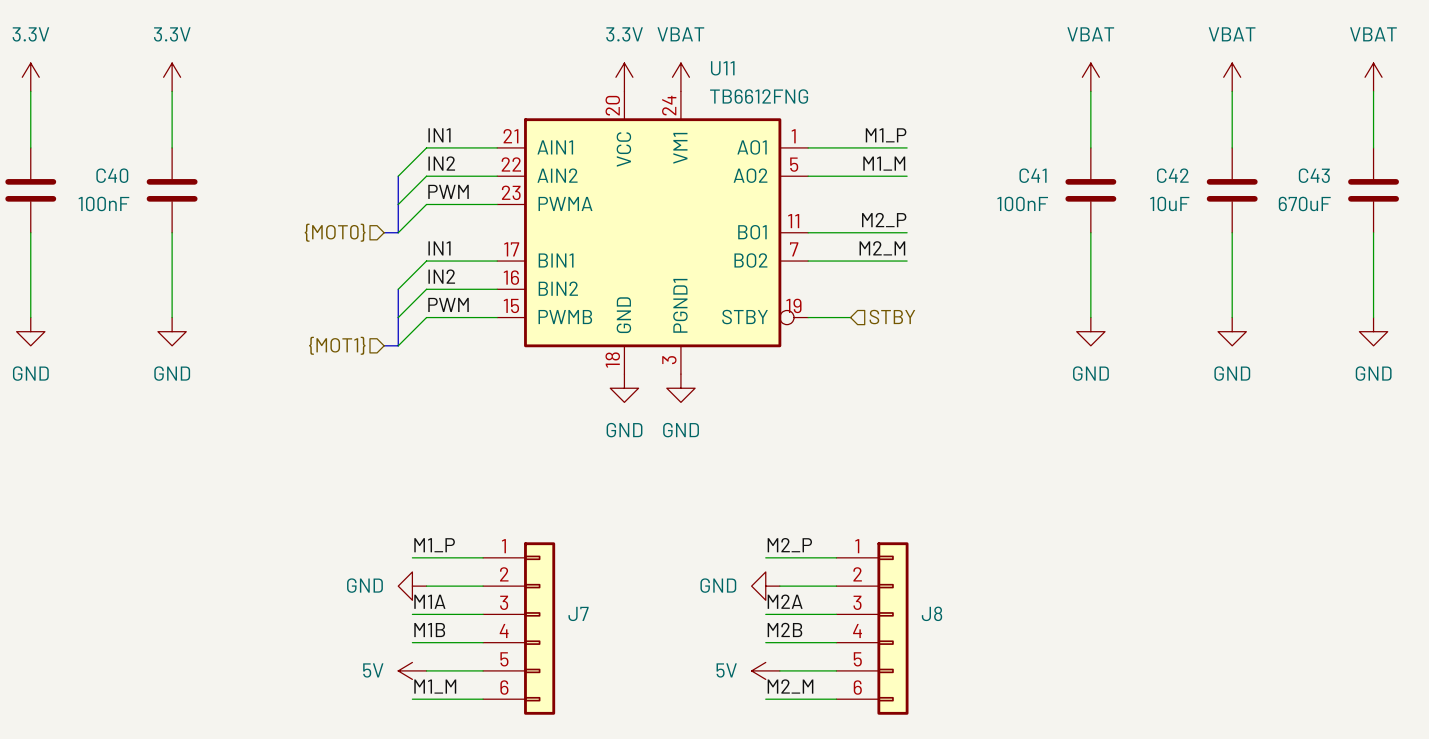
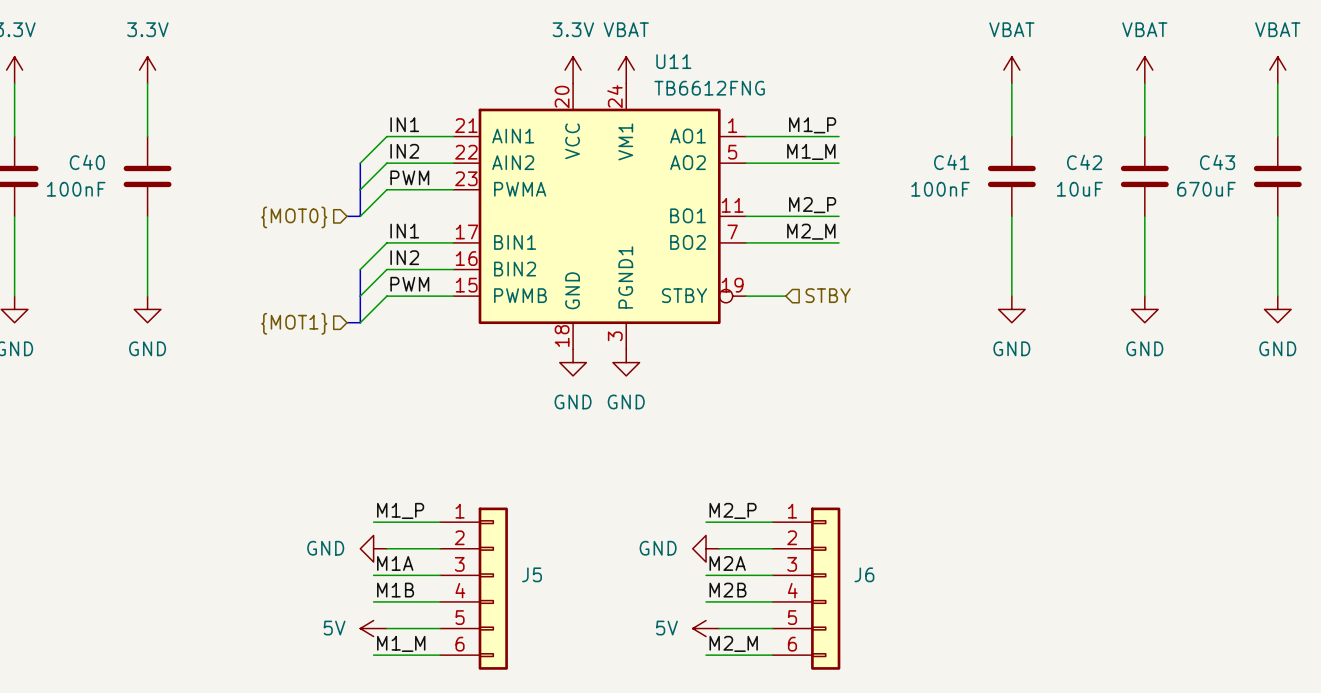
J7 name: J7 (578, 613) -> J5 (532, 574)
J8 name: J8 (932, 613) -> J6 (864, 574)

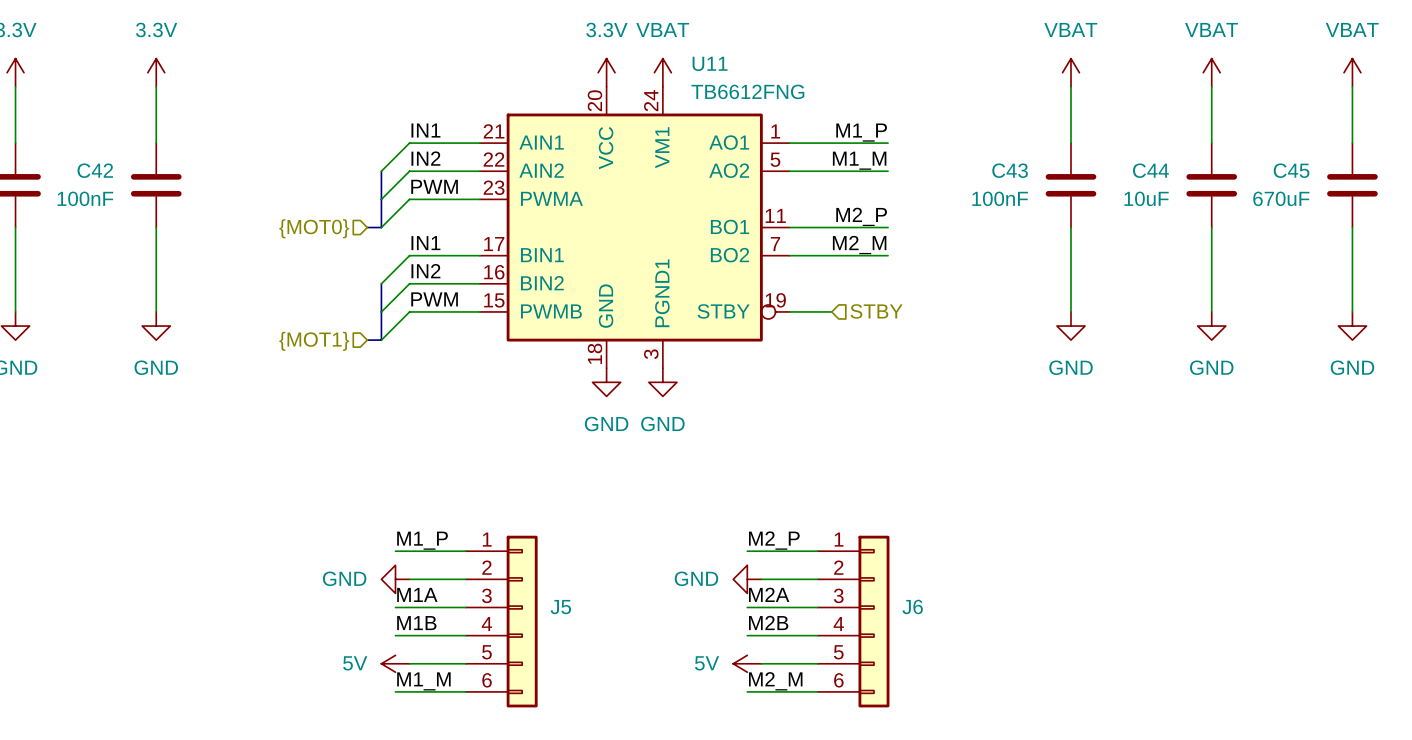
C40 name: C40 (87, 162) -> C42 (95, 170)
C41 name: C41 (951, 162) -> C43 (1010, 170)
C42 name: C42 (1084, 162) -> C44 (1150, 170)
C43 name: C43 (1217, 162) -> C45 (1291, 170)

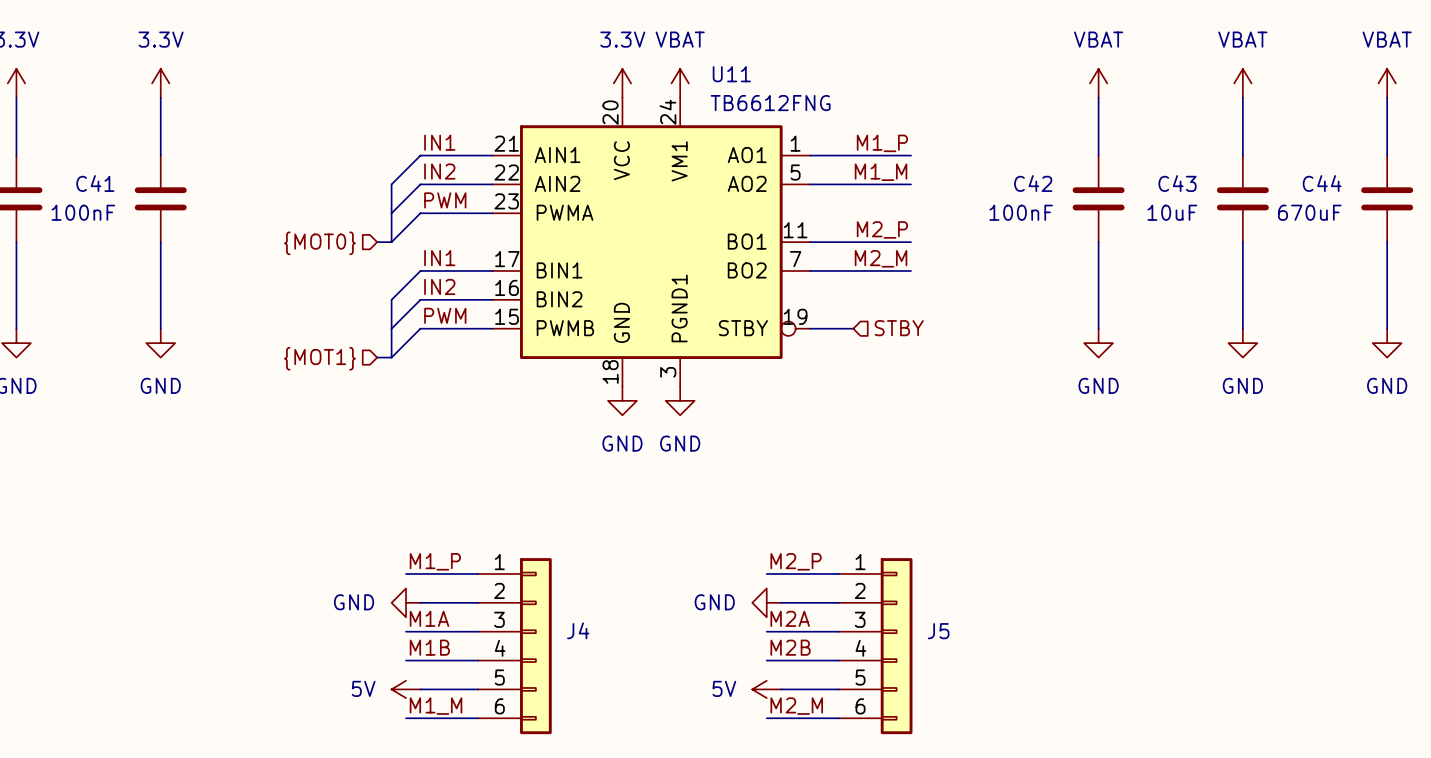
C42 name: C42 (95, 170) -> C41 (95, 183)
C43 name: C43 (1010, 170) -> C42 (1033, 183)
C44 name: C44 (1150, 170) -> C43 (1177, 183)
C45 name: C45 (1291, 170) -> C44 (1322, 183)
J6 name: J6 (912, 606) -> J5 (938, 631)
J5 name: J5 (560, 607) -> J4 (578, 630)

